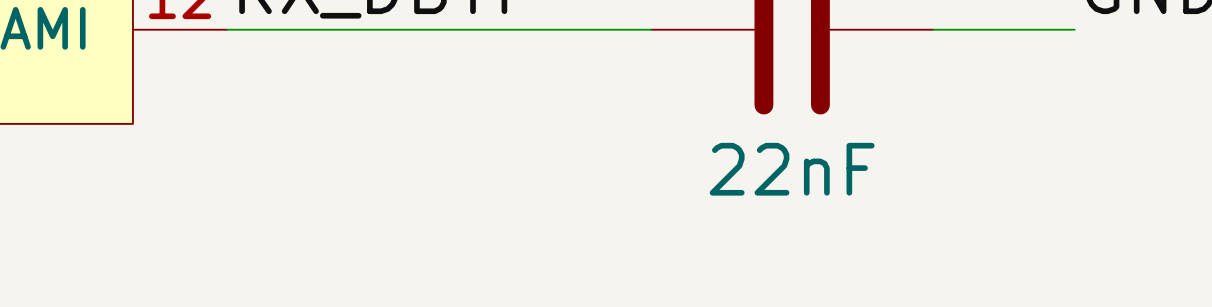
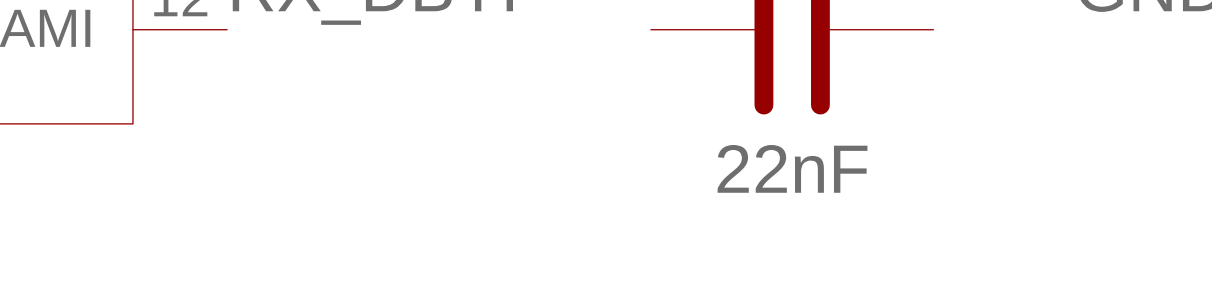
wire: (227, 29) (650, 29) -> none
wire: (933, 29) (1074, 29) -> none

